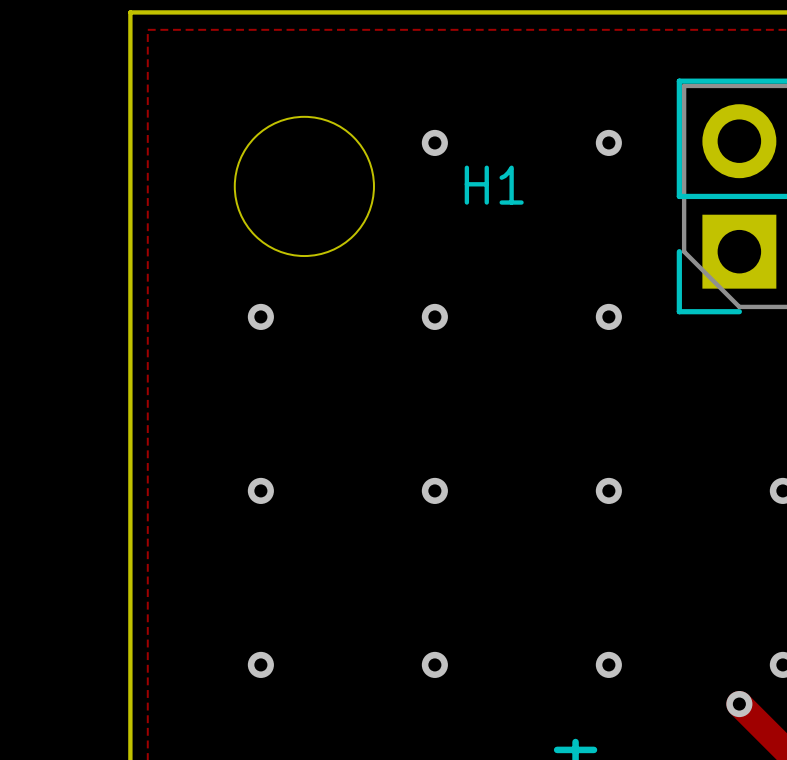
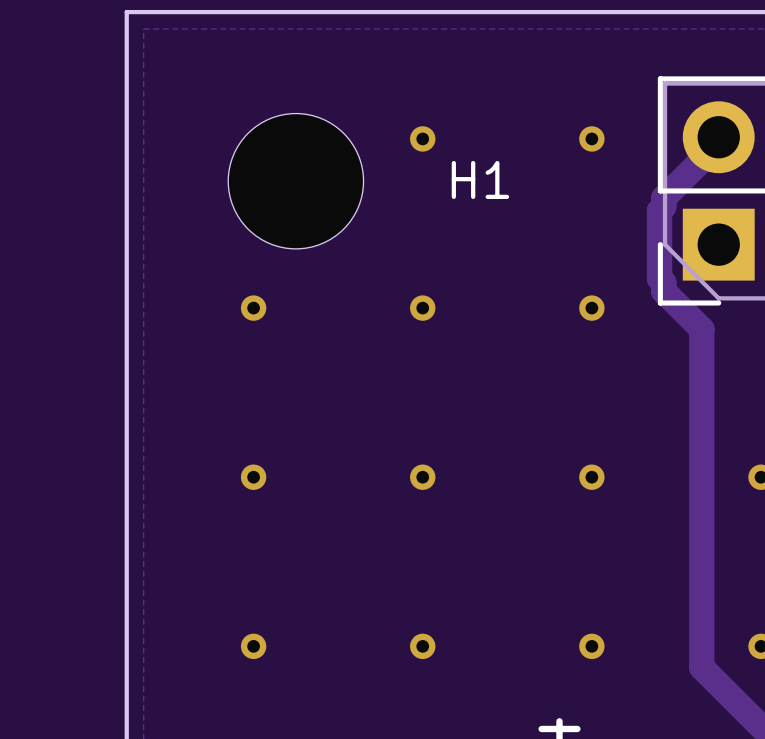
track: none -> (697, 164) (663, 198) (663, 206) (659, 210) (659, 278) (663, 282) (663, 291) (701, 329) (701, 667) (718, 684)
via: (739, 704) -> none

